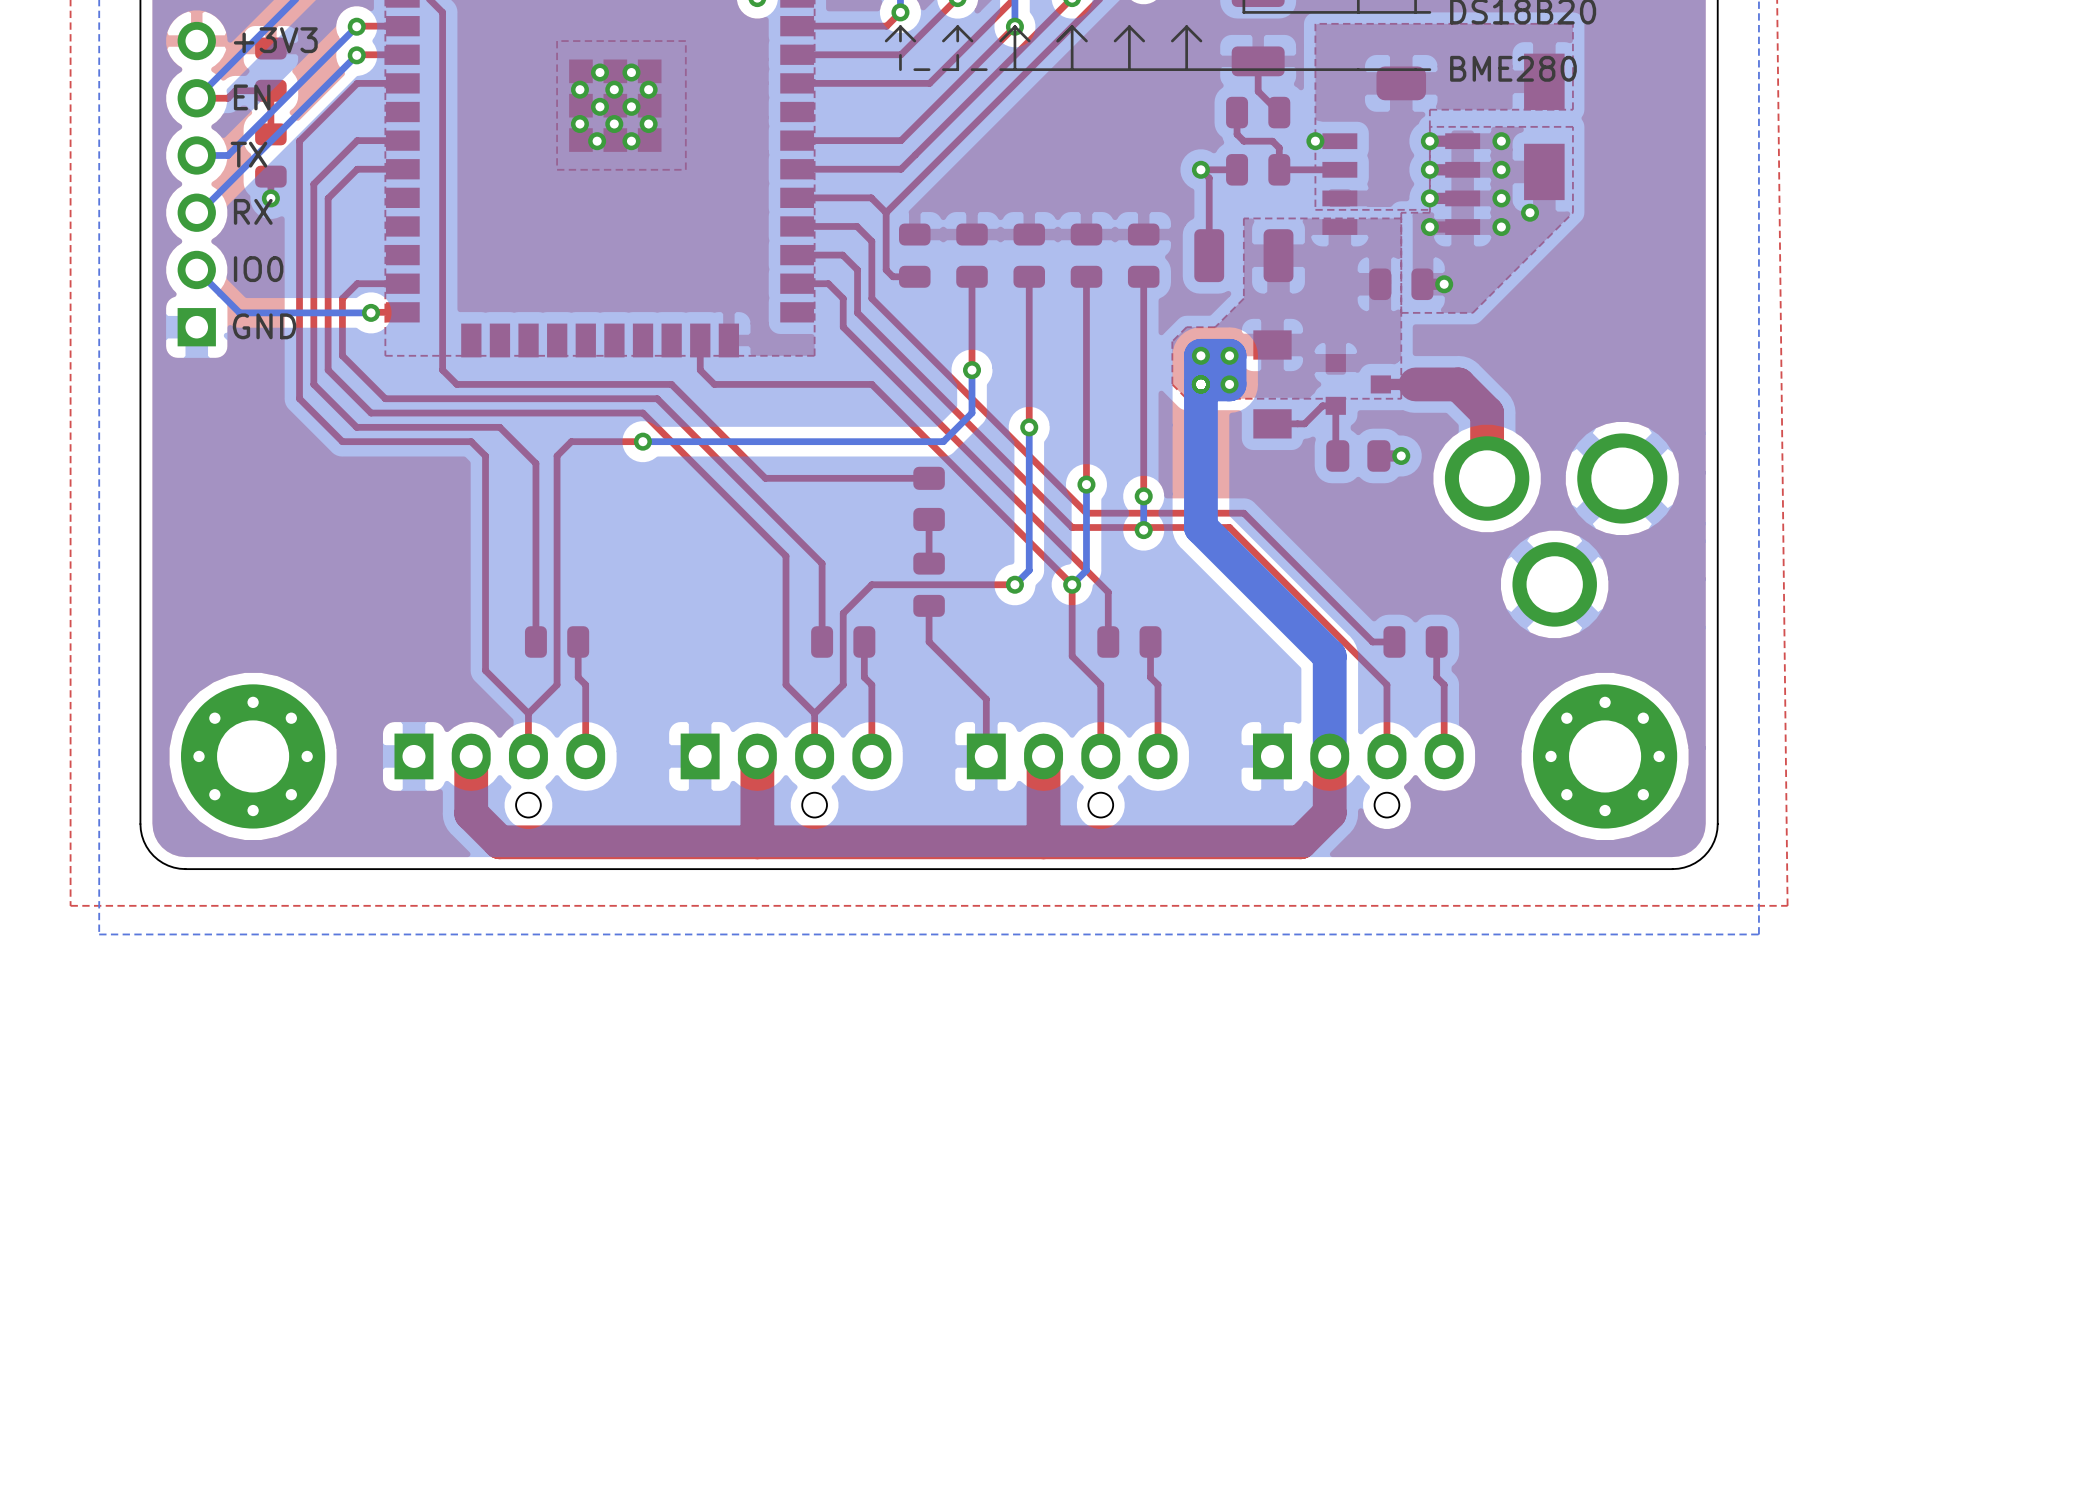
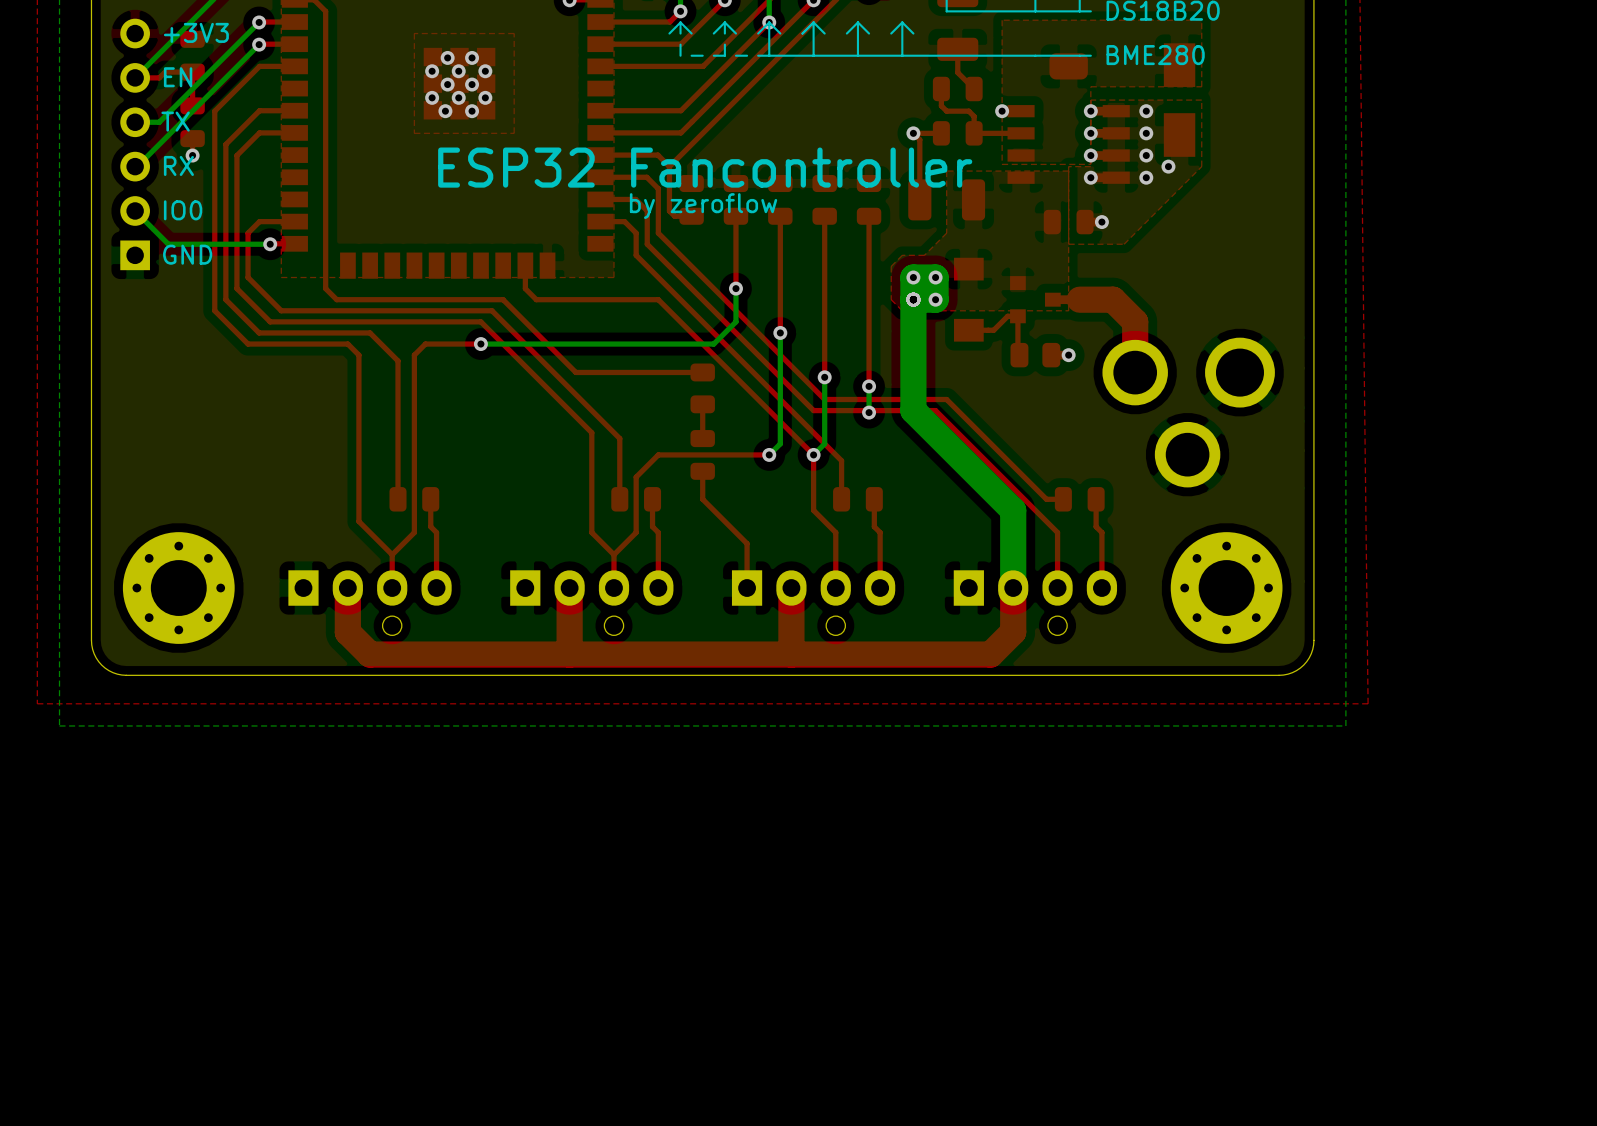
text: none -> ESP32 Fancontroller (705, 167)
text: none -> by zeroflow (703, 206)

